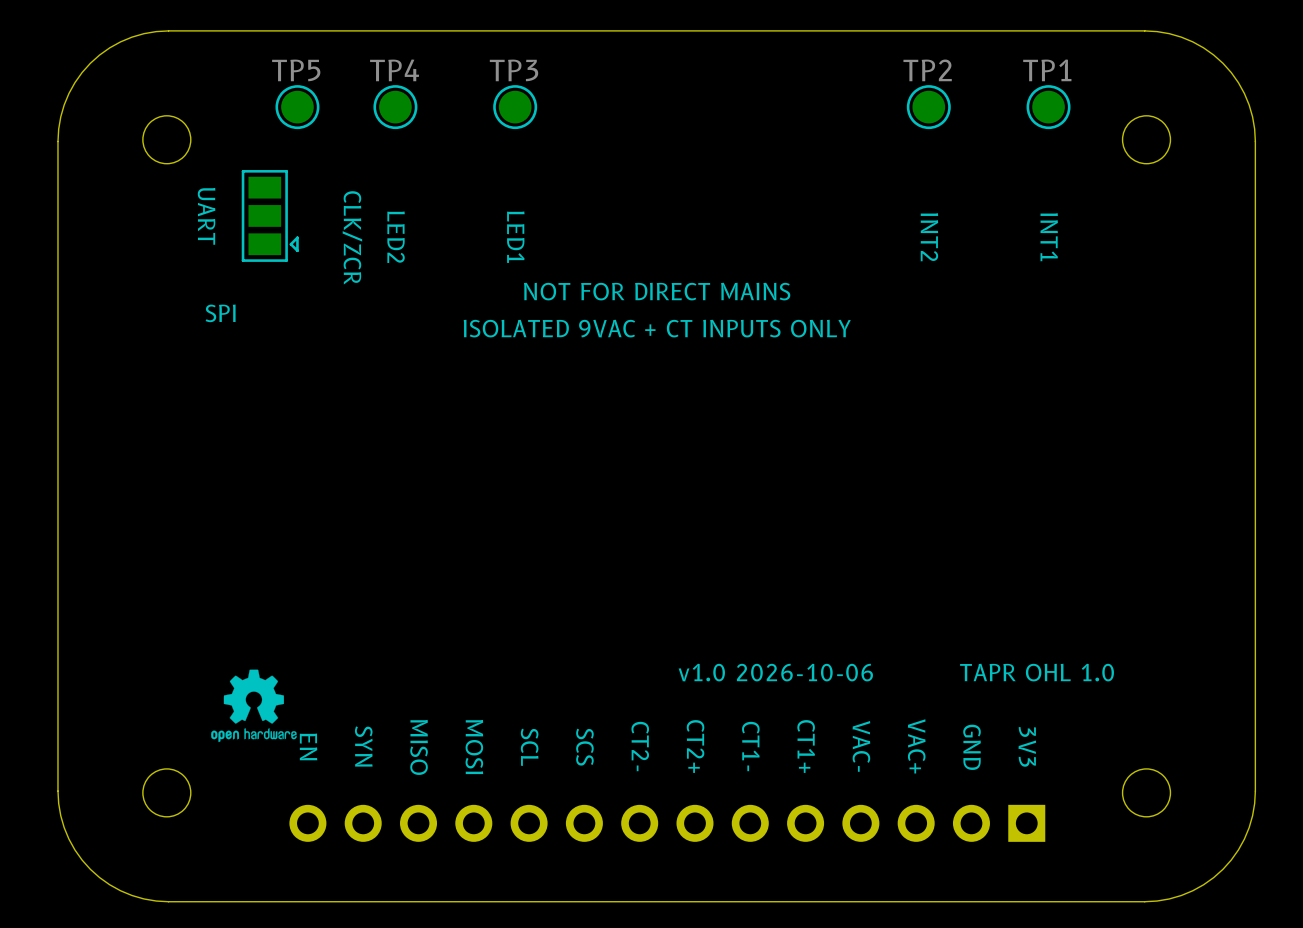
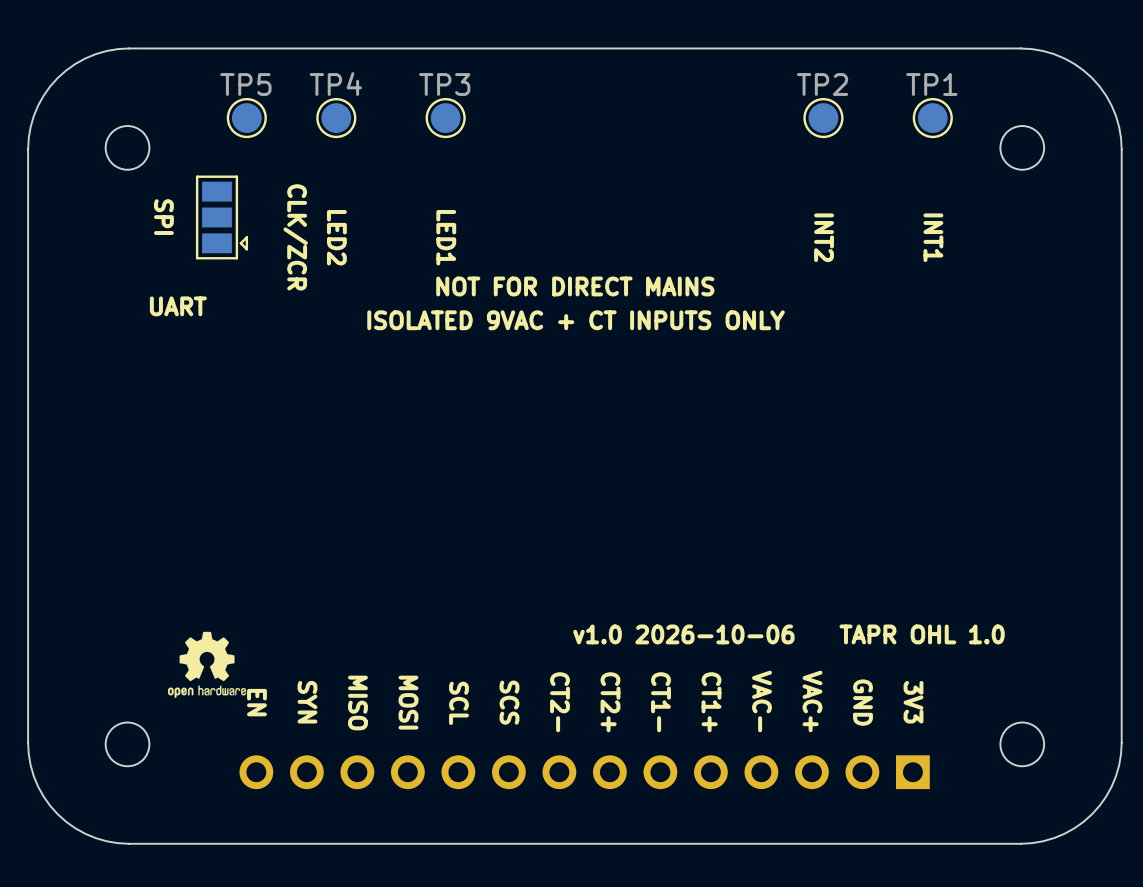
text: UART (206, 216) -> SPI (163, 217)
text: SPI (220, 313) -> UART (178, 306)

